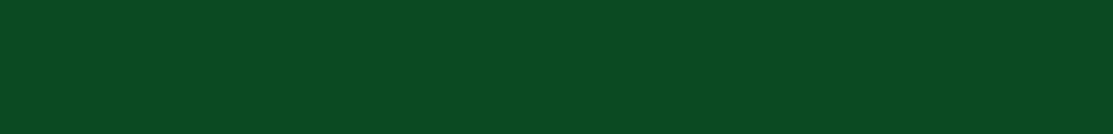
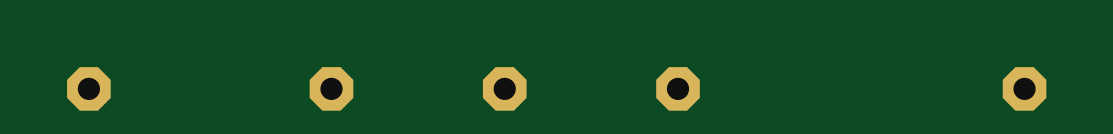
part: none -> (88, 88)
part: none -> (331, 88)
part: none -> (504, 88)
part: none -> (678, 88)
part: none -> (1024, 88)

